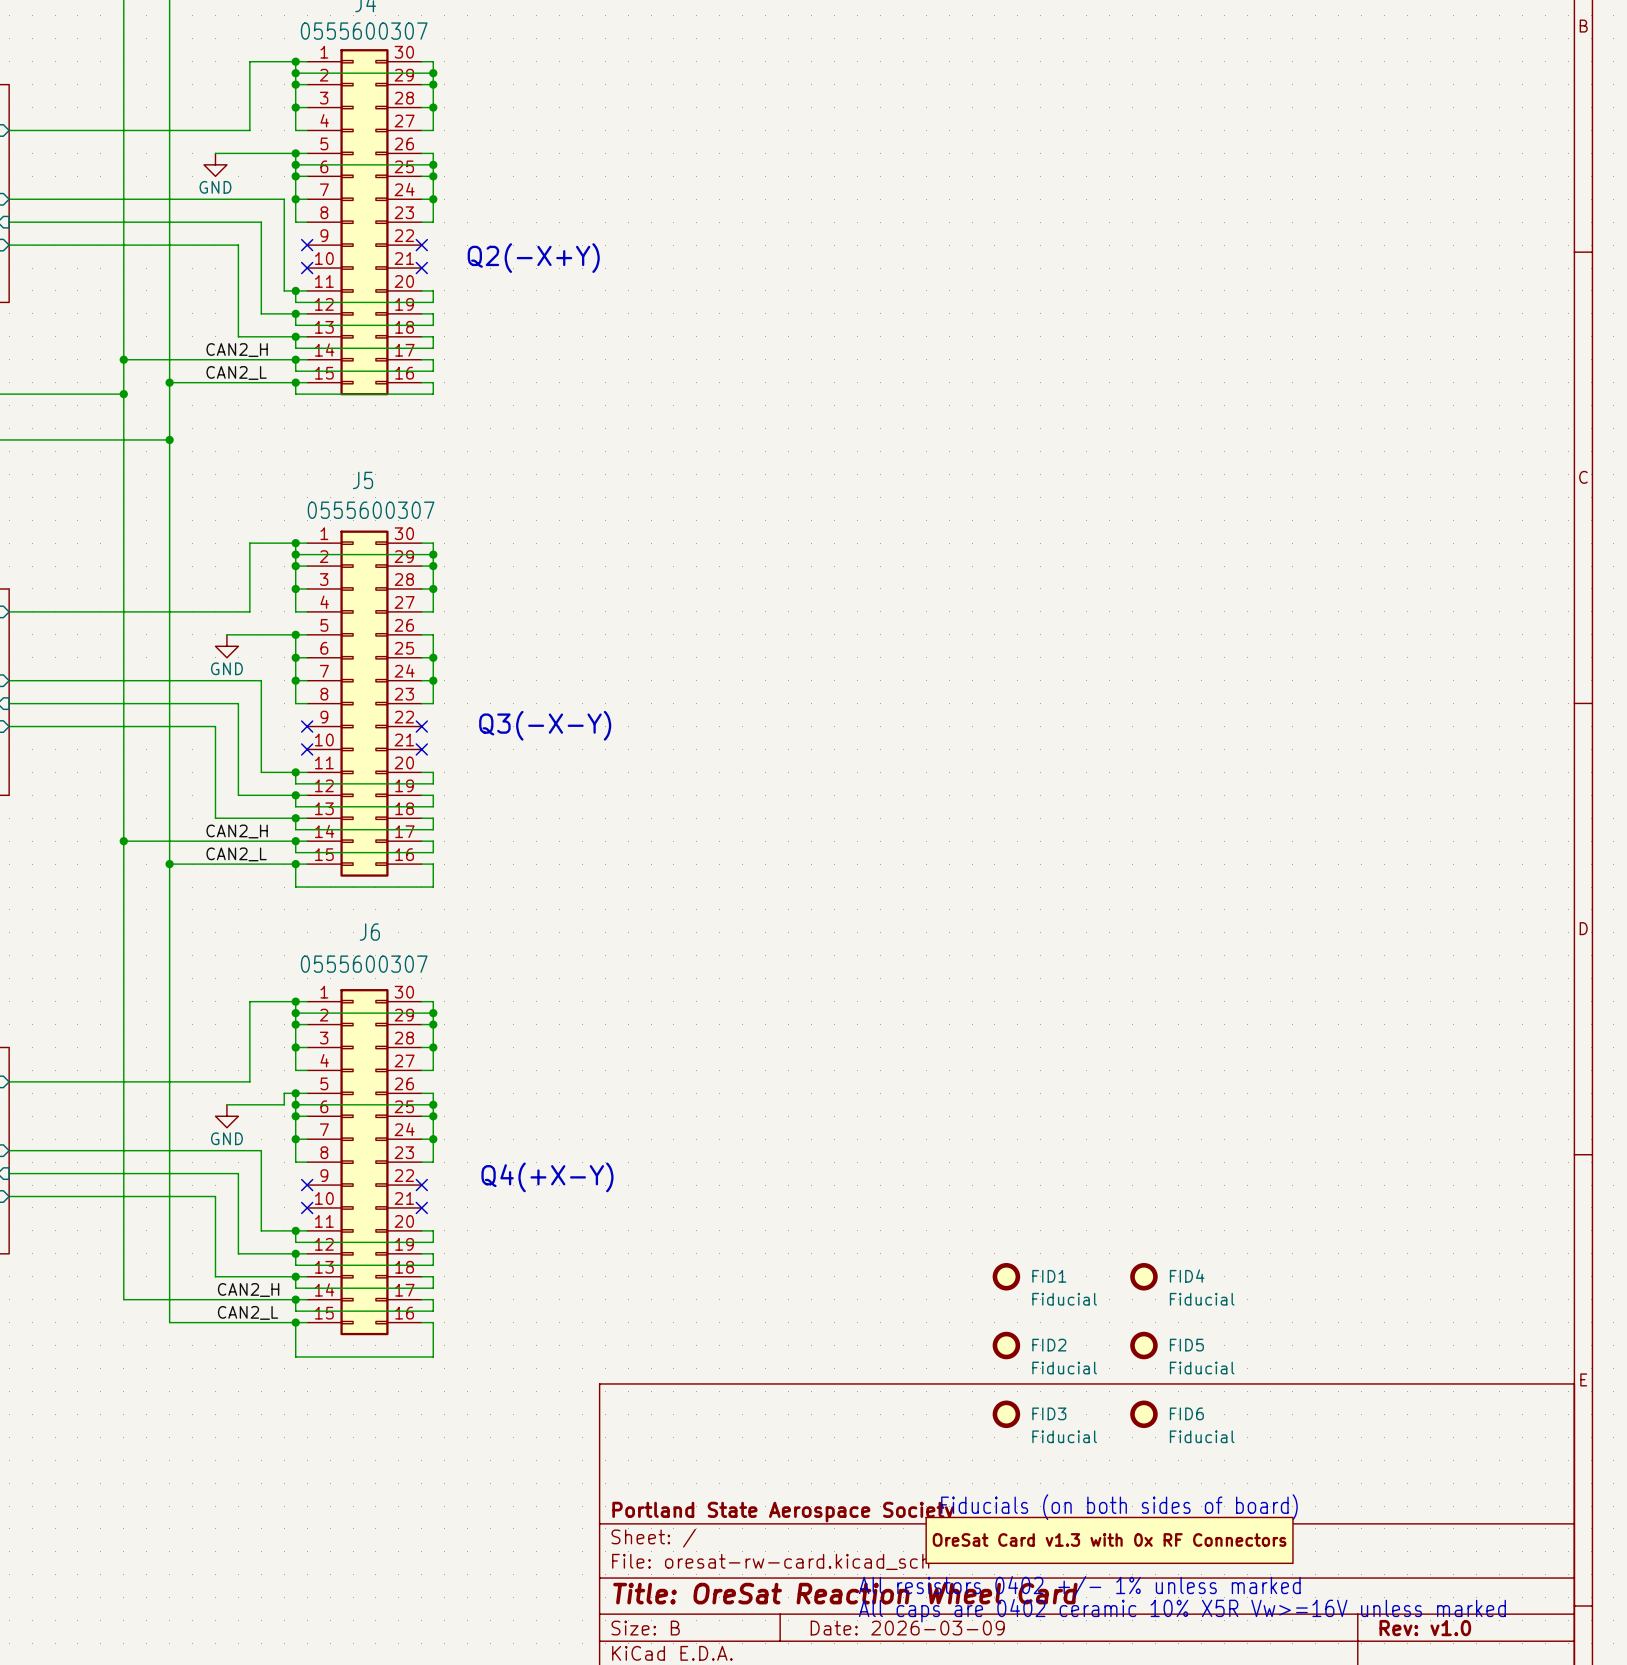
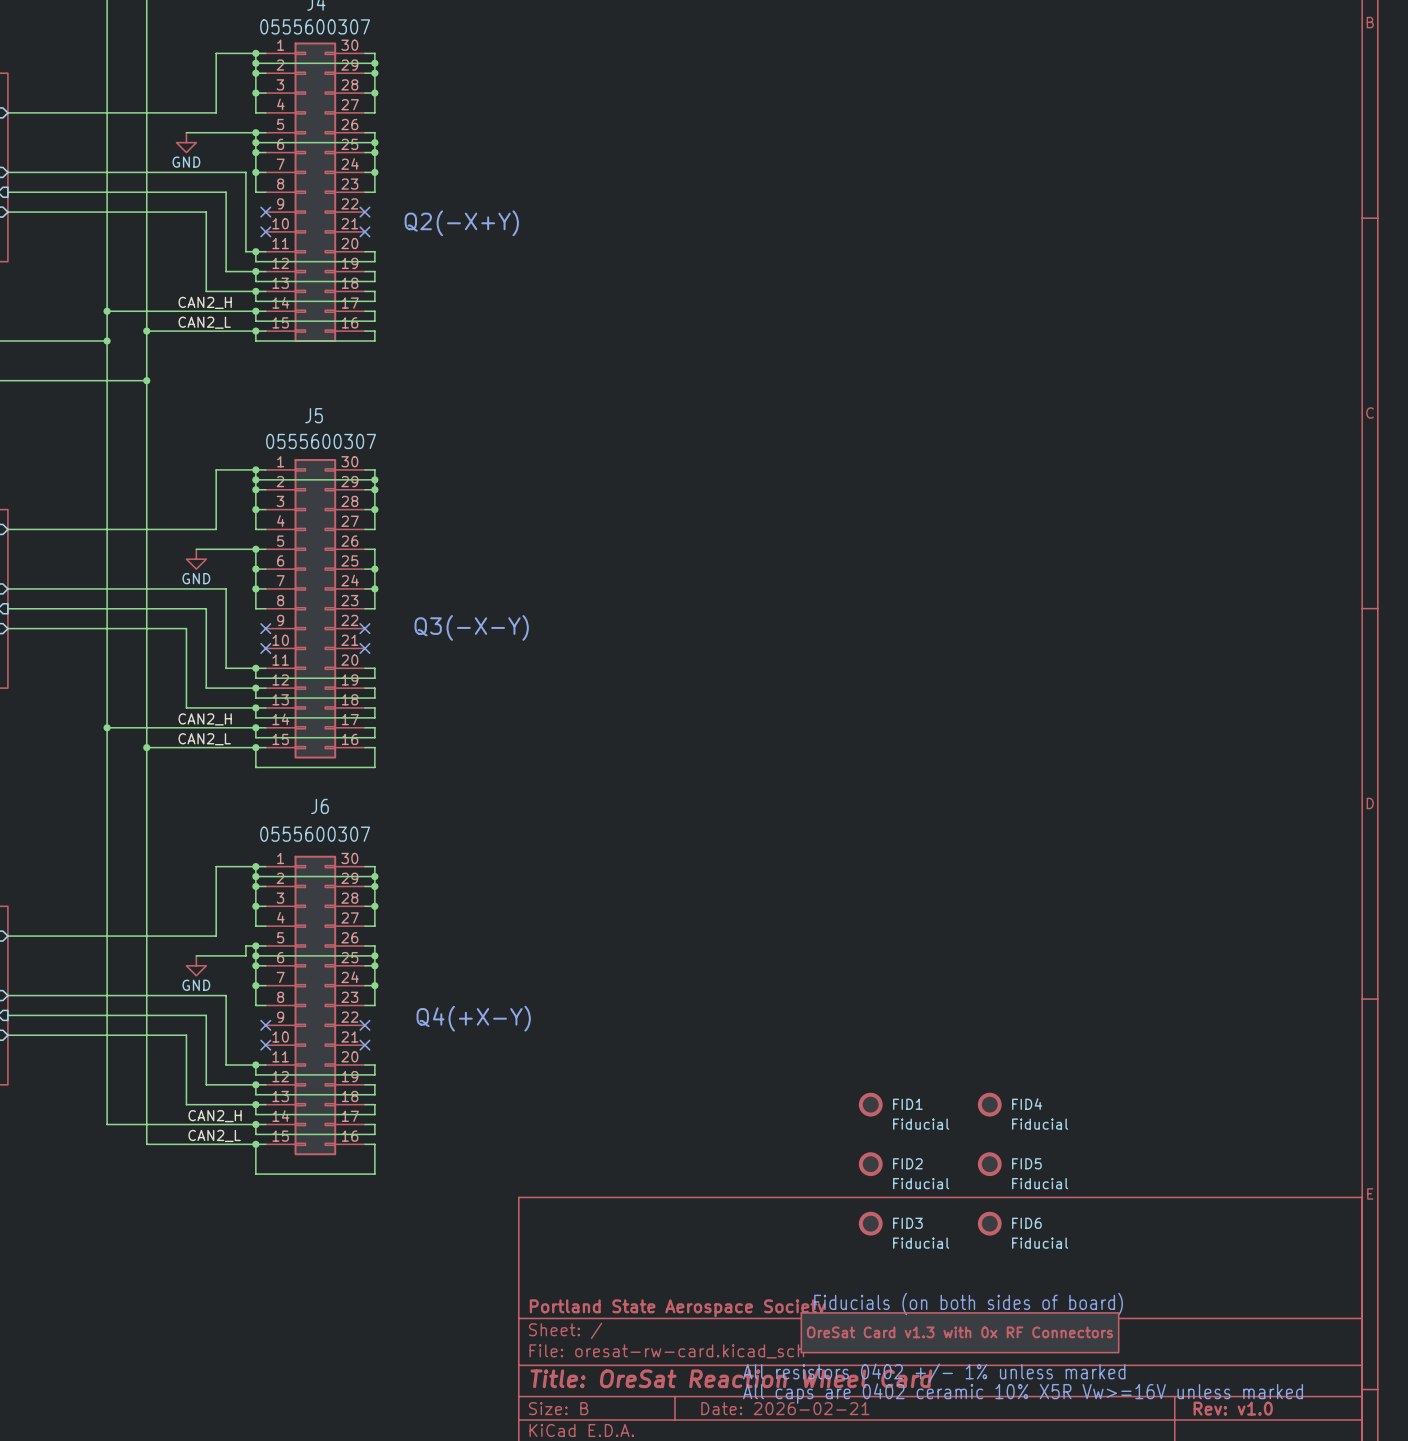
title block: Date: 2026-03-09 (907, 1628) -> Date: 2026-02-21 (785, 1408)

